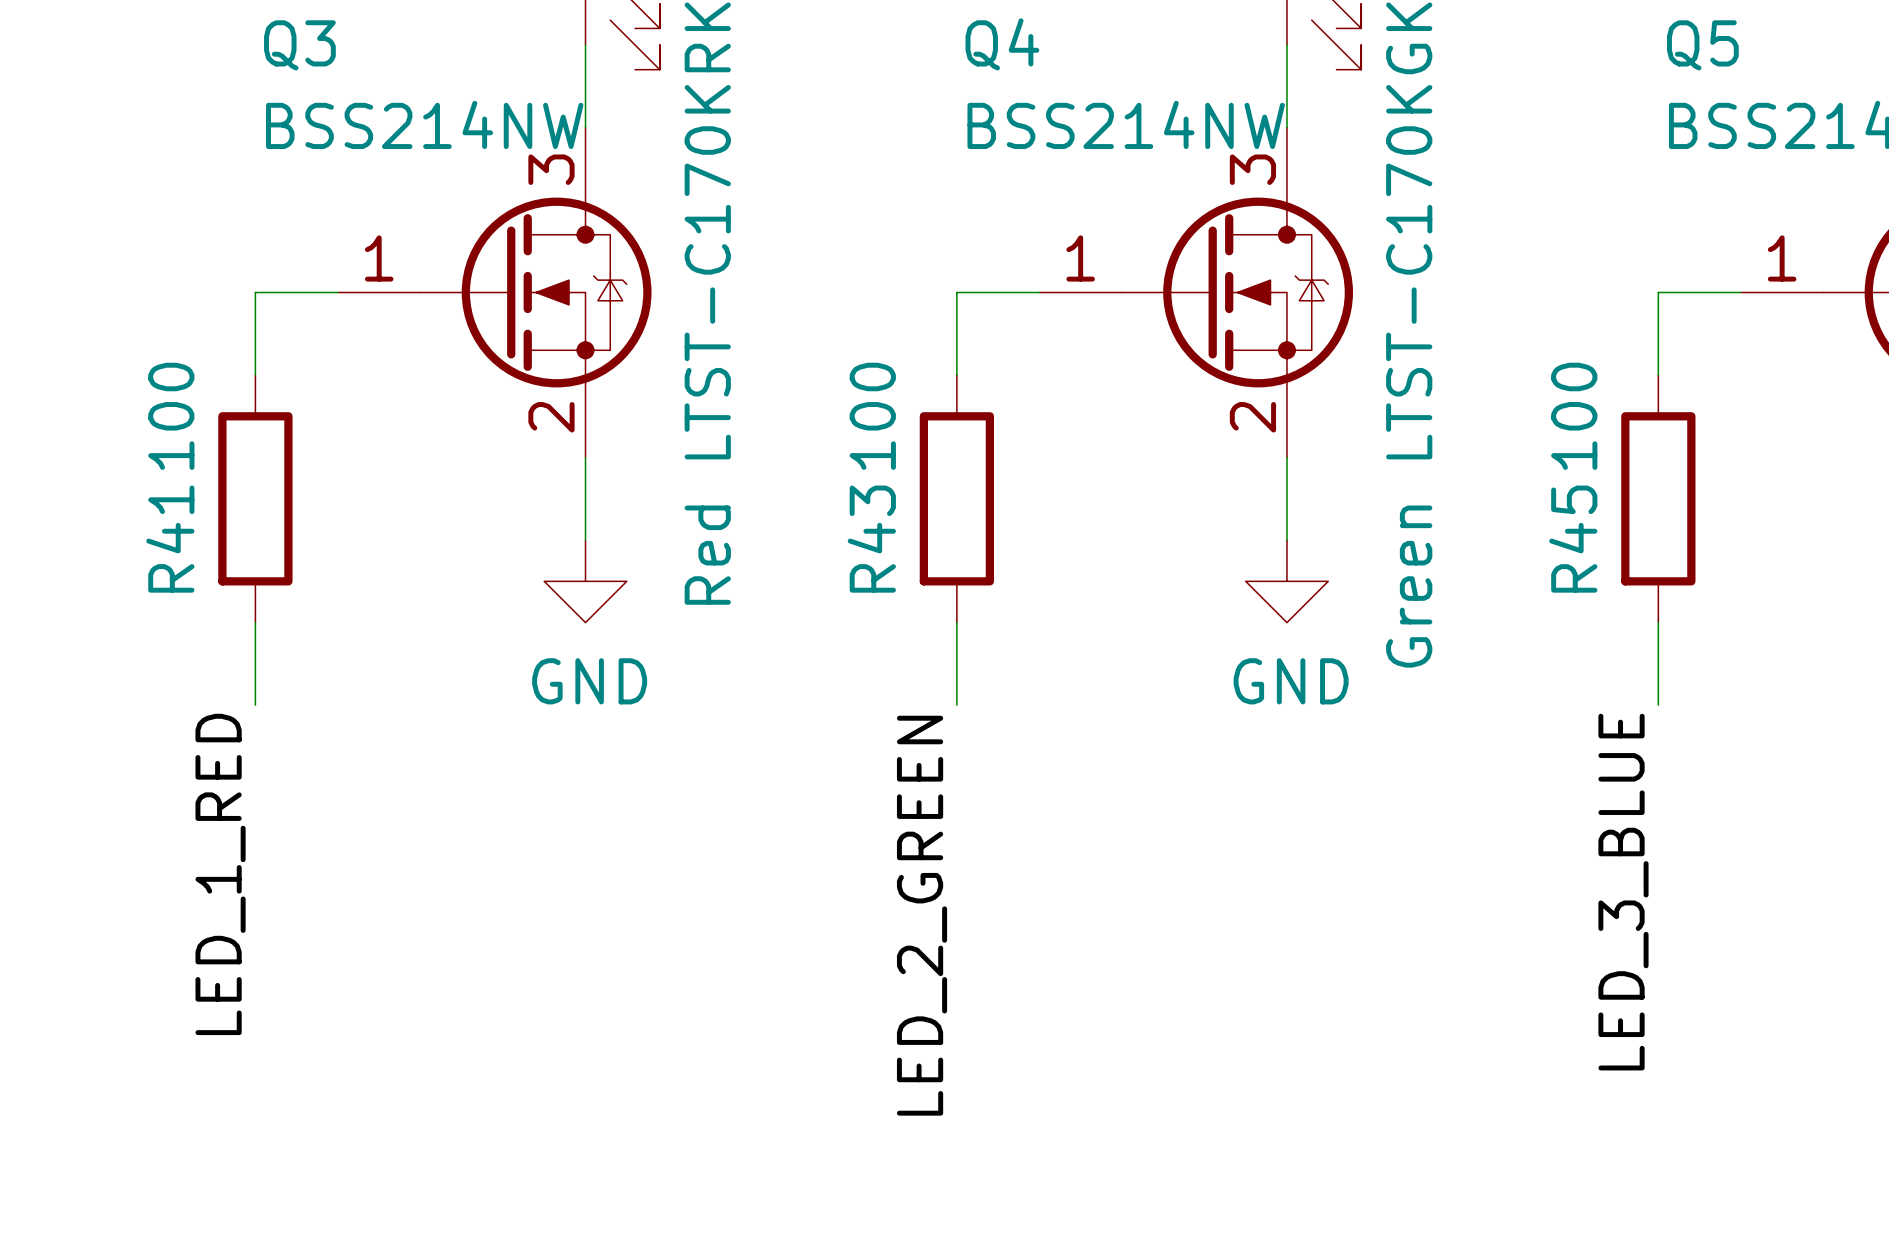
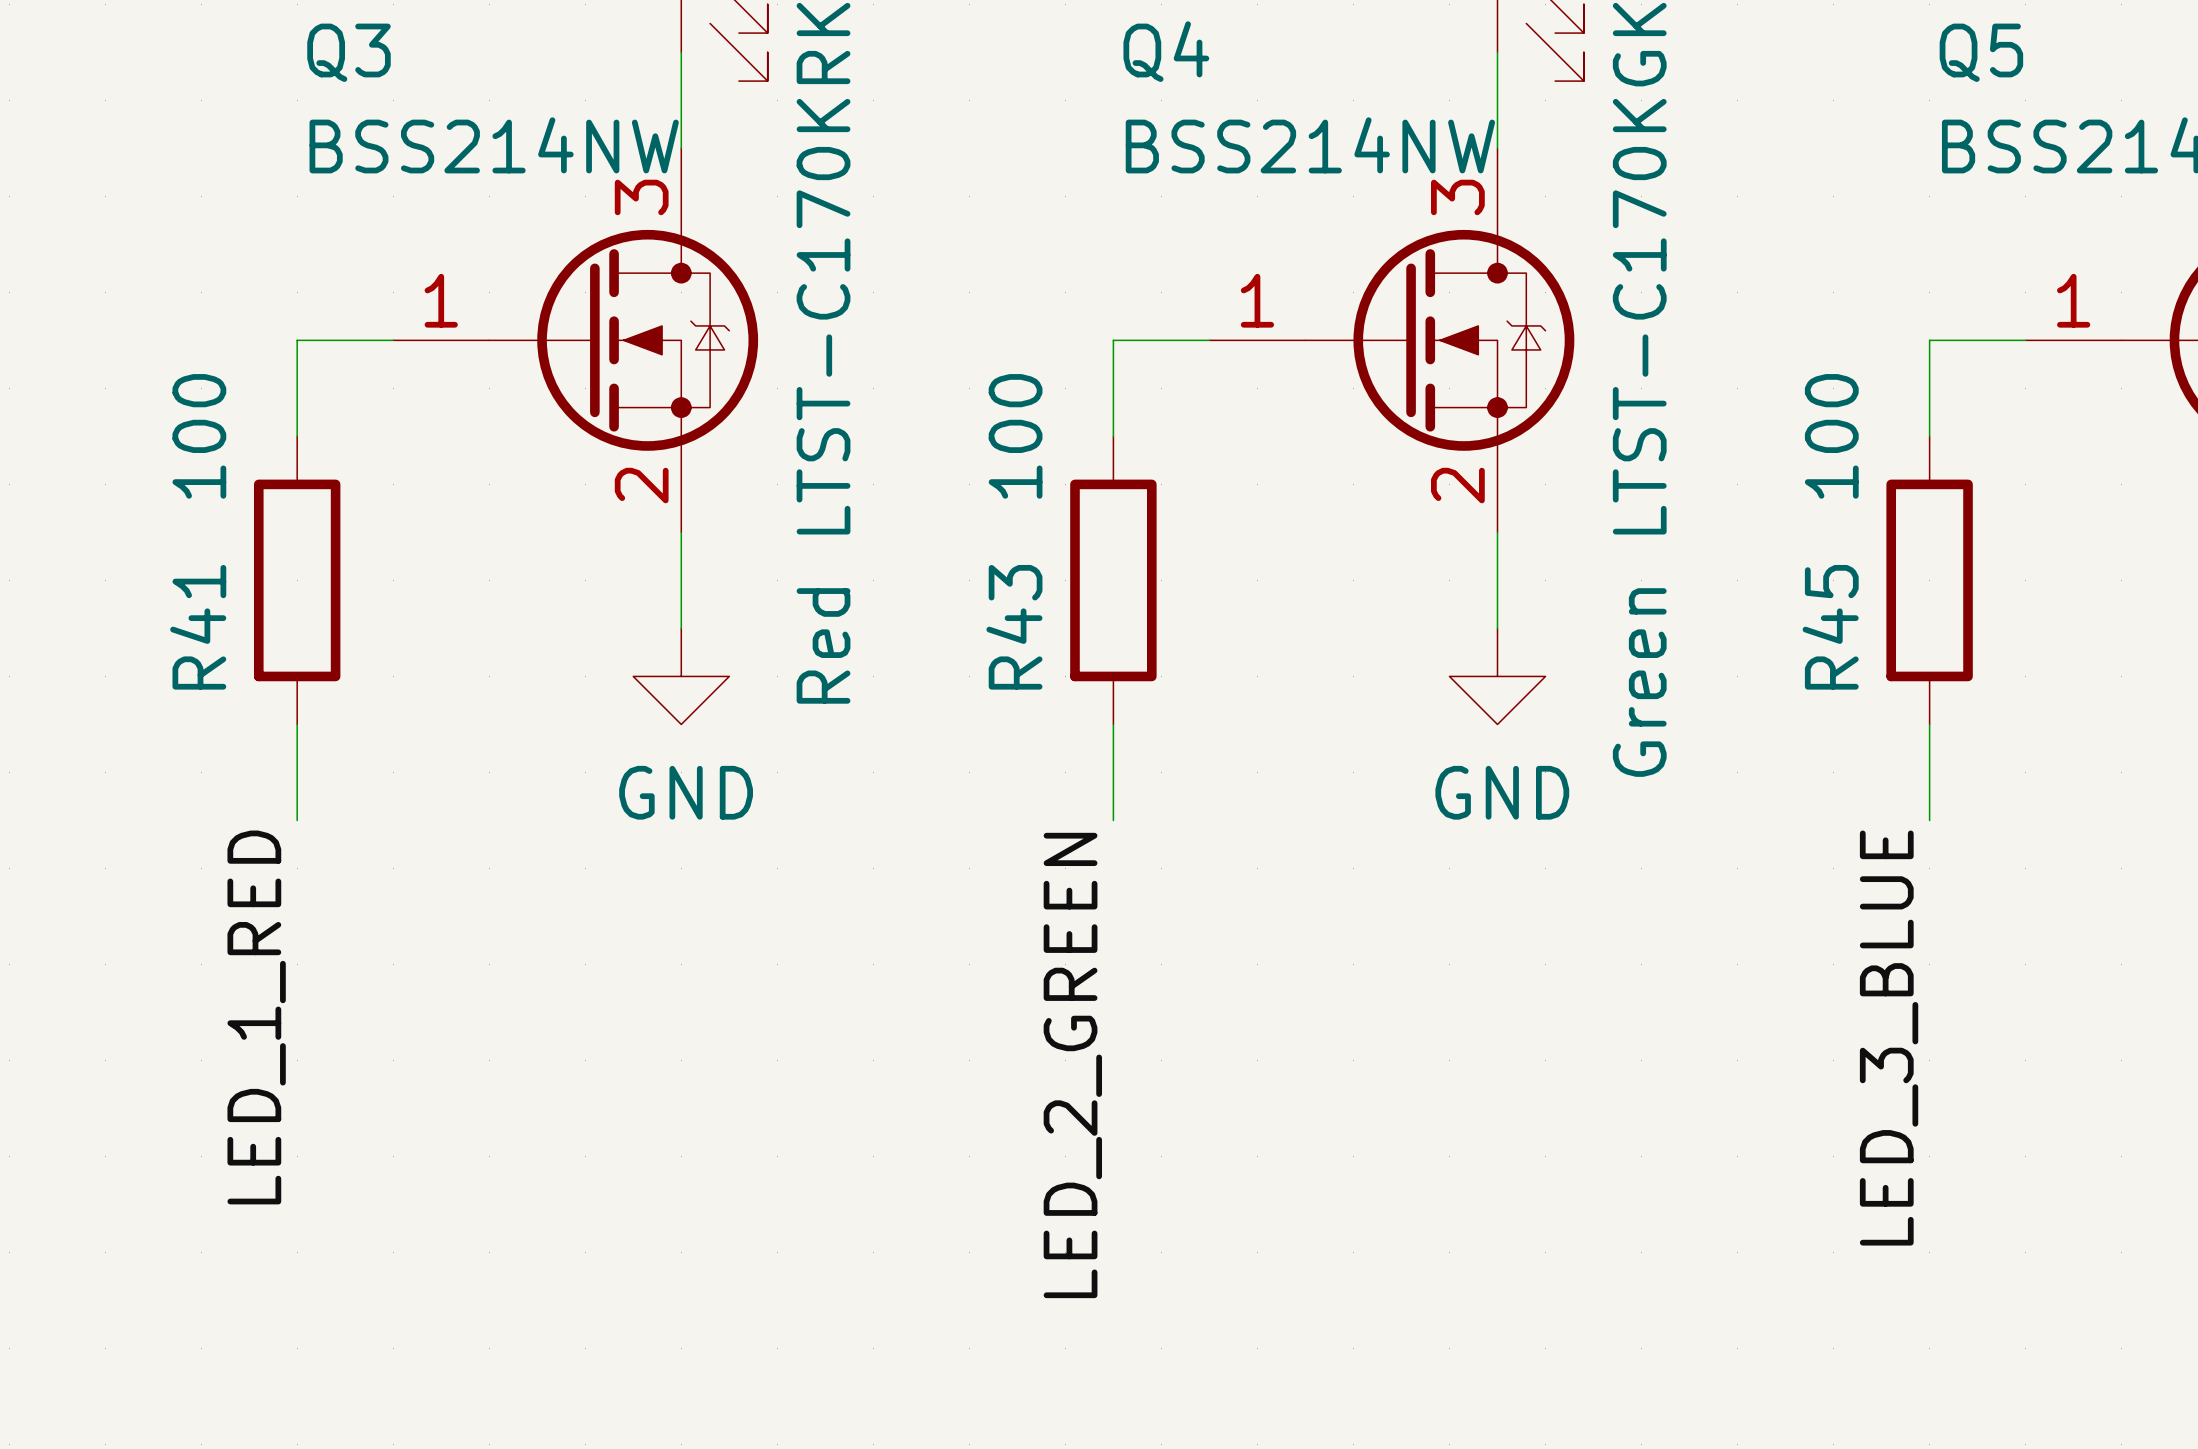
R41 value position: 100 (171, 416) -> 100 (199, 436)
R43 value position: 100 (872, 416) -> 100 (1015, 436)
R45 value position: 100 (1574, 416) -> 100 (1831, 436)

